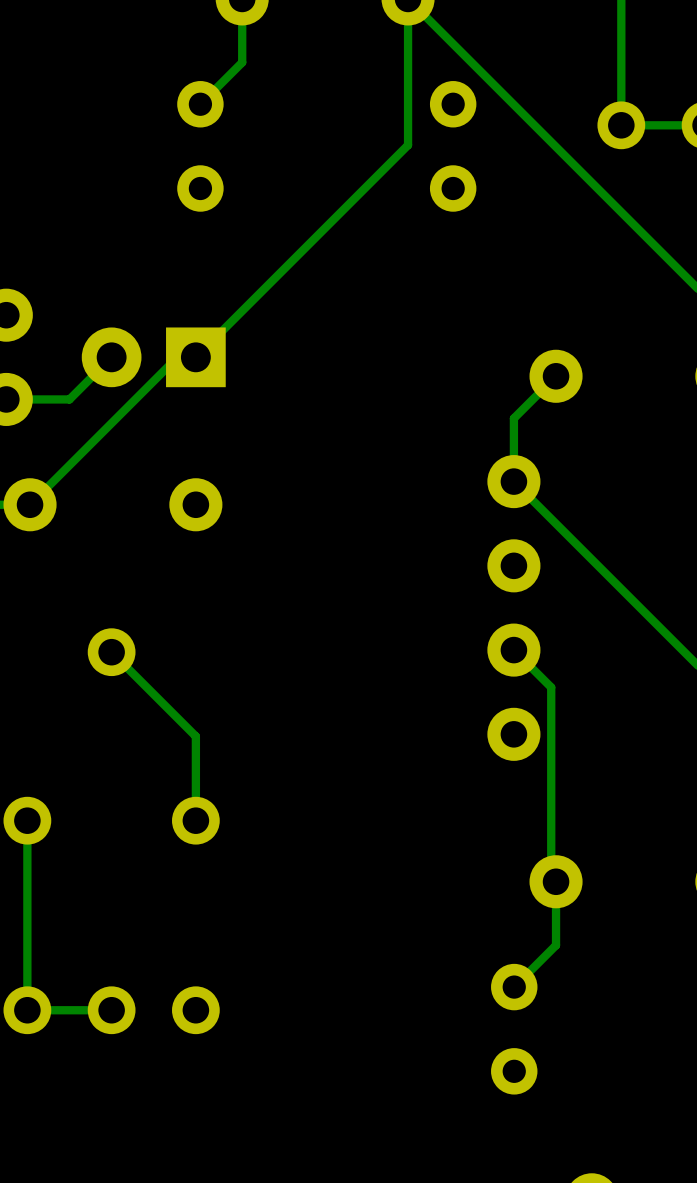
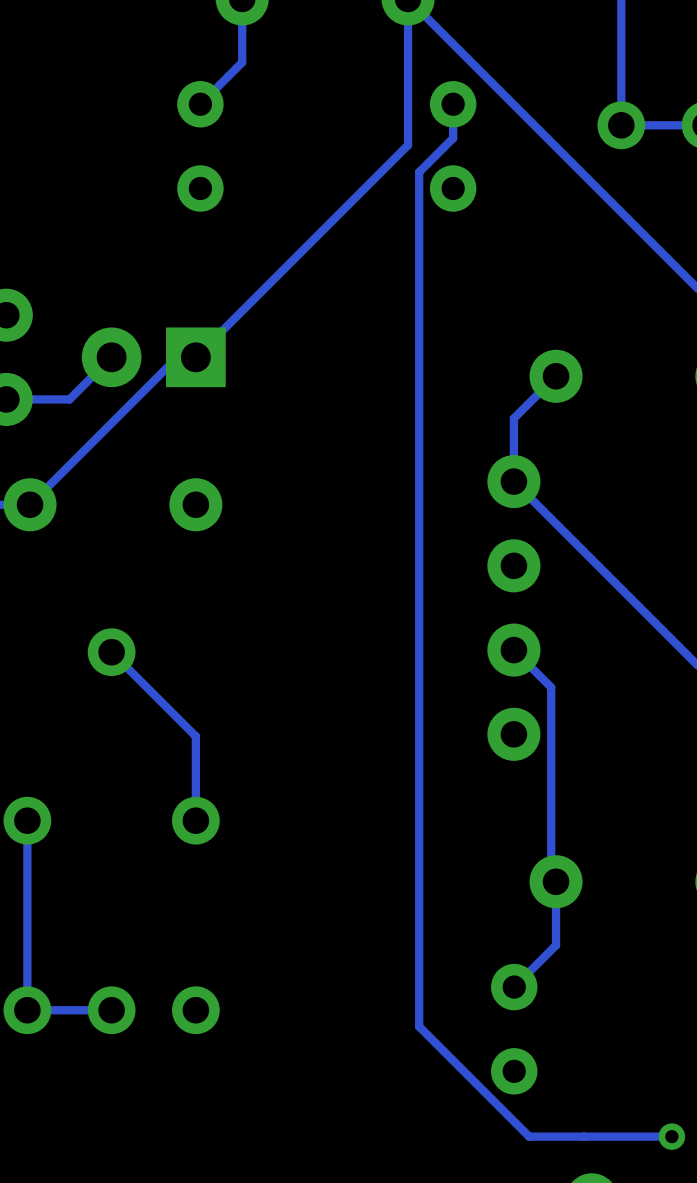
track: none -> (453, 104) (453, 138) (419, 172) (419, 1026) (529, 1136) (671, 1136)
via: none -> (671, 1136)

